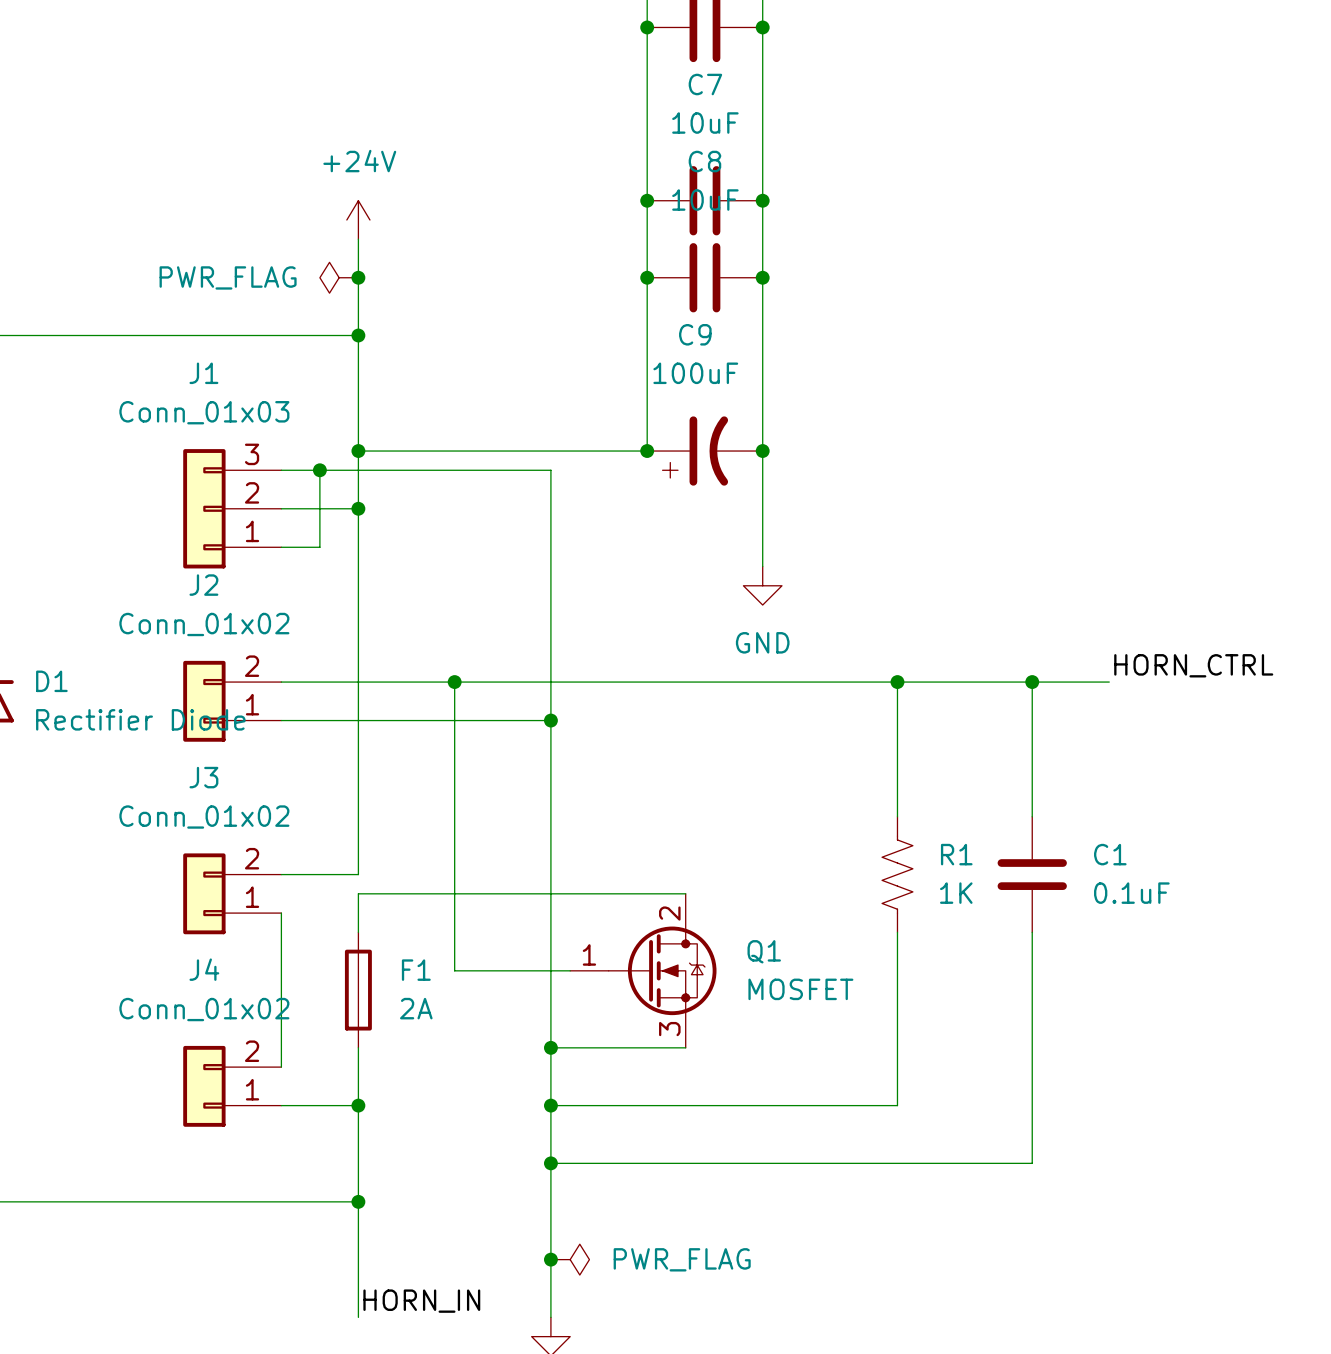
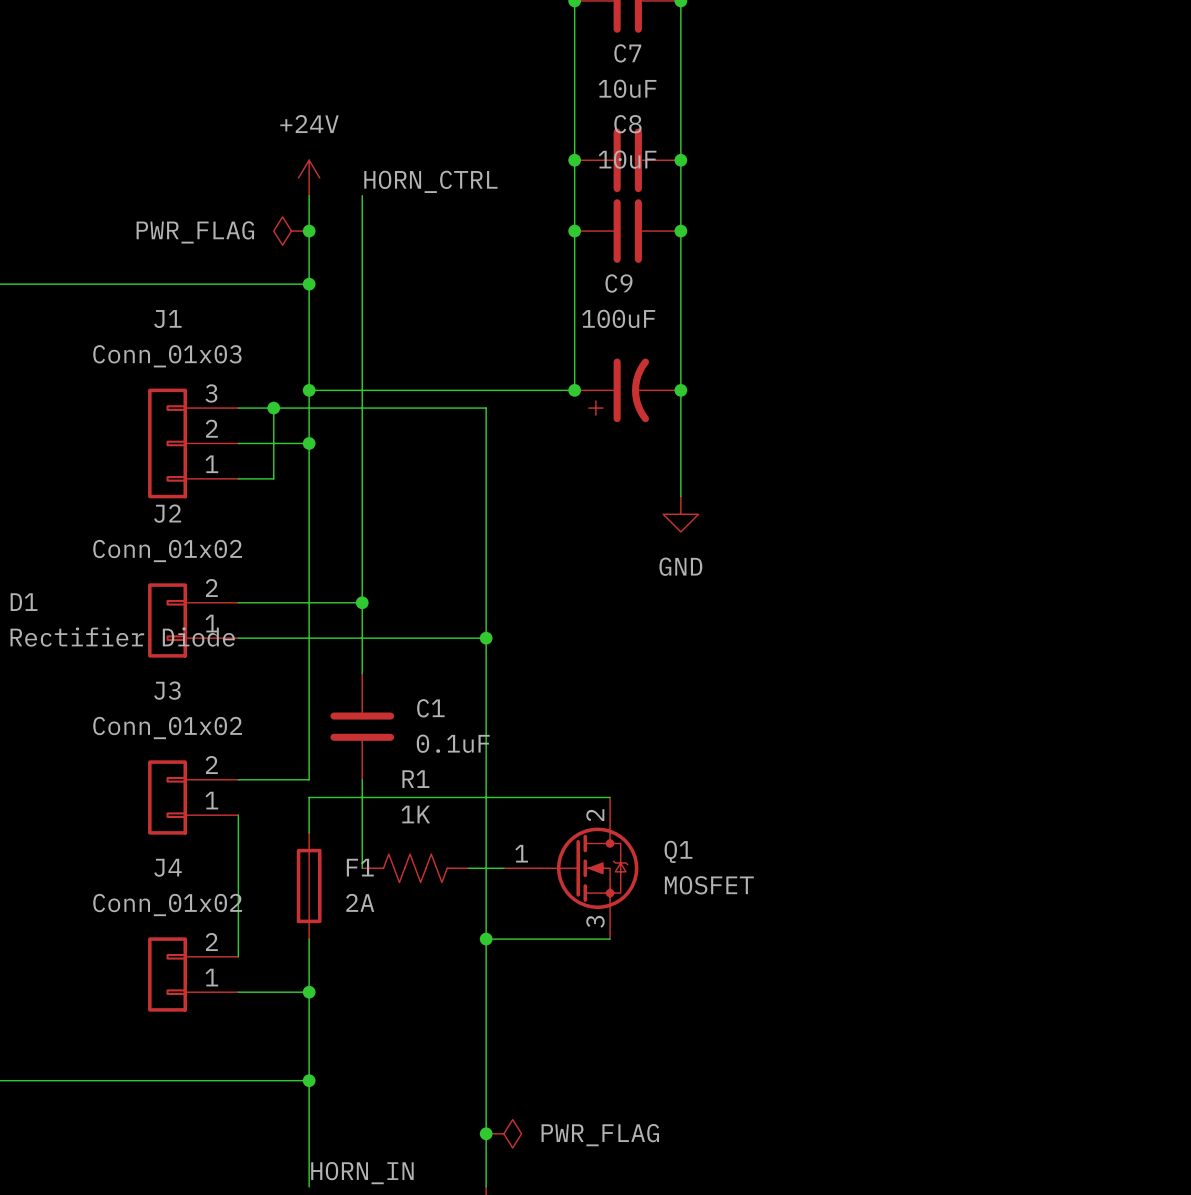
label: none -> HORN_CTRL (430, 181)
wire: none -> (362, 195) (362, 673)
label: HORN_CTRL (1193, 665) -> none
wire: (416, 682) (1109, 682) -> none
wire: (454, 682) (454, 970) (531, 970) -> none
junction position: (454, 682) -> (362, 602)
wire: (897, 682) (897, 816) -> none
junction: (897, 682) -> none
wire: (1032, 682) (1032, 816) -> none
junction: (1032, 682) -> none
R1 name position: R1 (956, 854) -> R1 (415, 779)
wire: none -> (362, 779) (362, 868)
R1 rotation: 0° (897, 874) -> 90° clockwise (415, 868)
R1 position: (897, 874) -> (415, 868)
C1 position: (1032, 874) -> (362, 726)
R1 value position: 1K (956, 893) -> 1K (415, 814)
wire: (897, 932) (897, 1105) (550, 1105) -> none
wire: (1032, 932) (1032, 1163) (550, 1163) -> none
junction: (550, 1105) -> none
junction: (550, 1163) -> none

